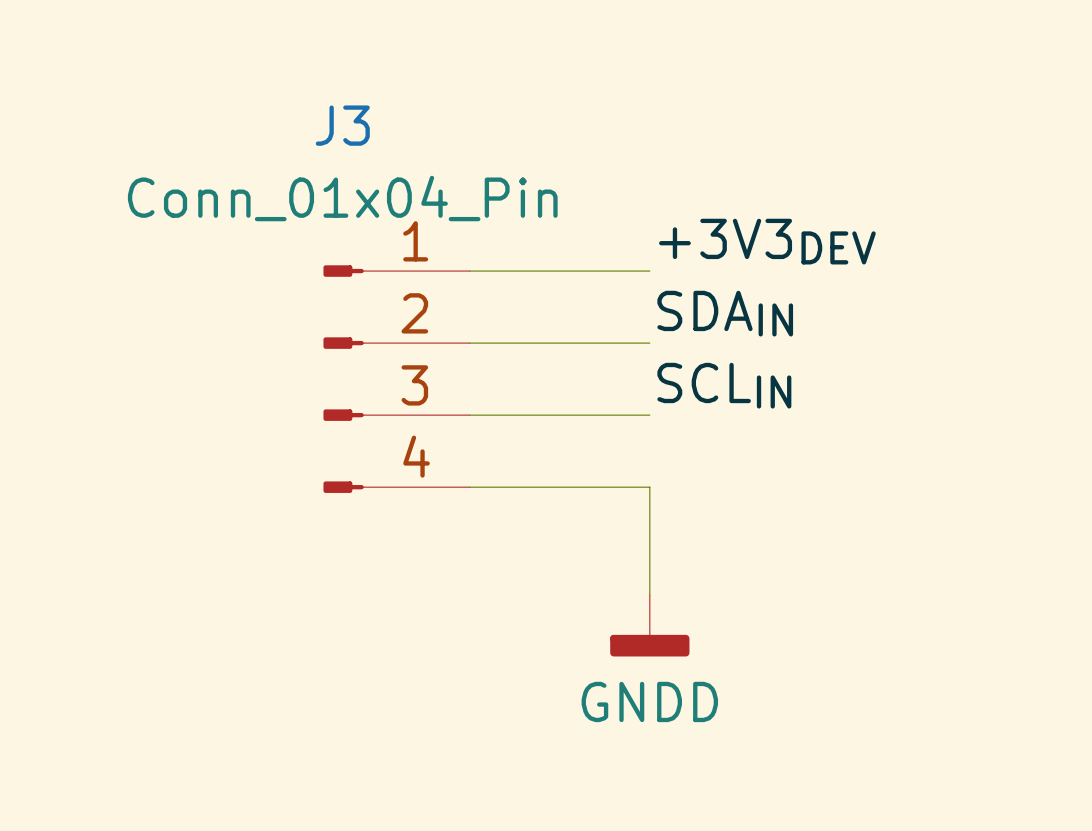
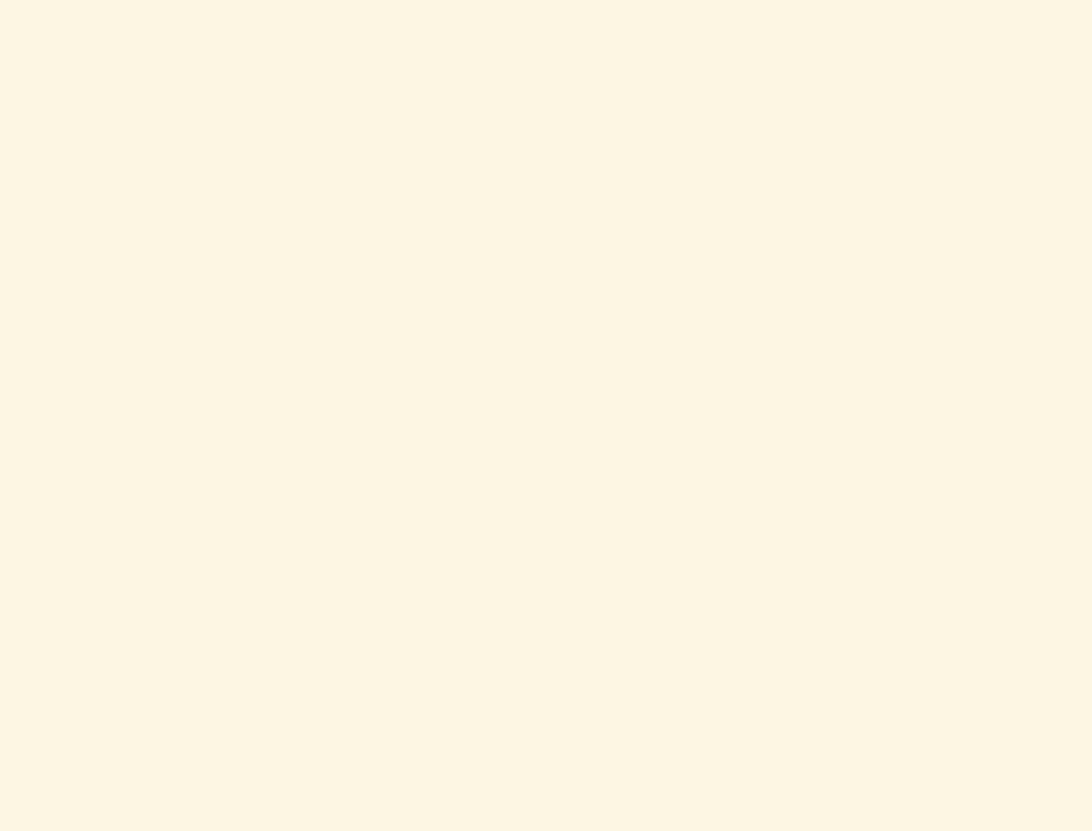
label: +3V3DEV (767, 241) -> none
wire: (469, 271) (649, 271) -> none
label: SDAIN (725, 313) -> none
wire: (469, 343) (649, 343) -> none
J3: Conn_01x04_Pin (396, 379) -> none
label: SCLIN (724, 385) -> none
wire: (469, 415) (649, 415) -> none
wire: (469, 487) (649, 487) (649, 595) -> none
power symbol: GNDD (649, 625) -> none

